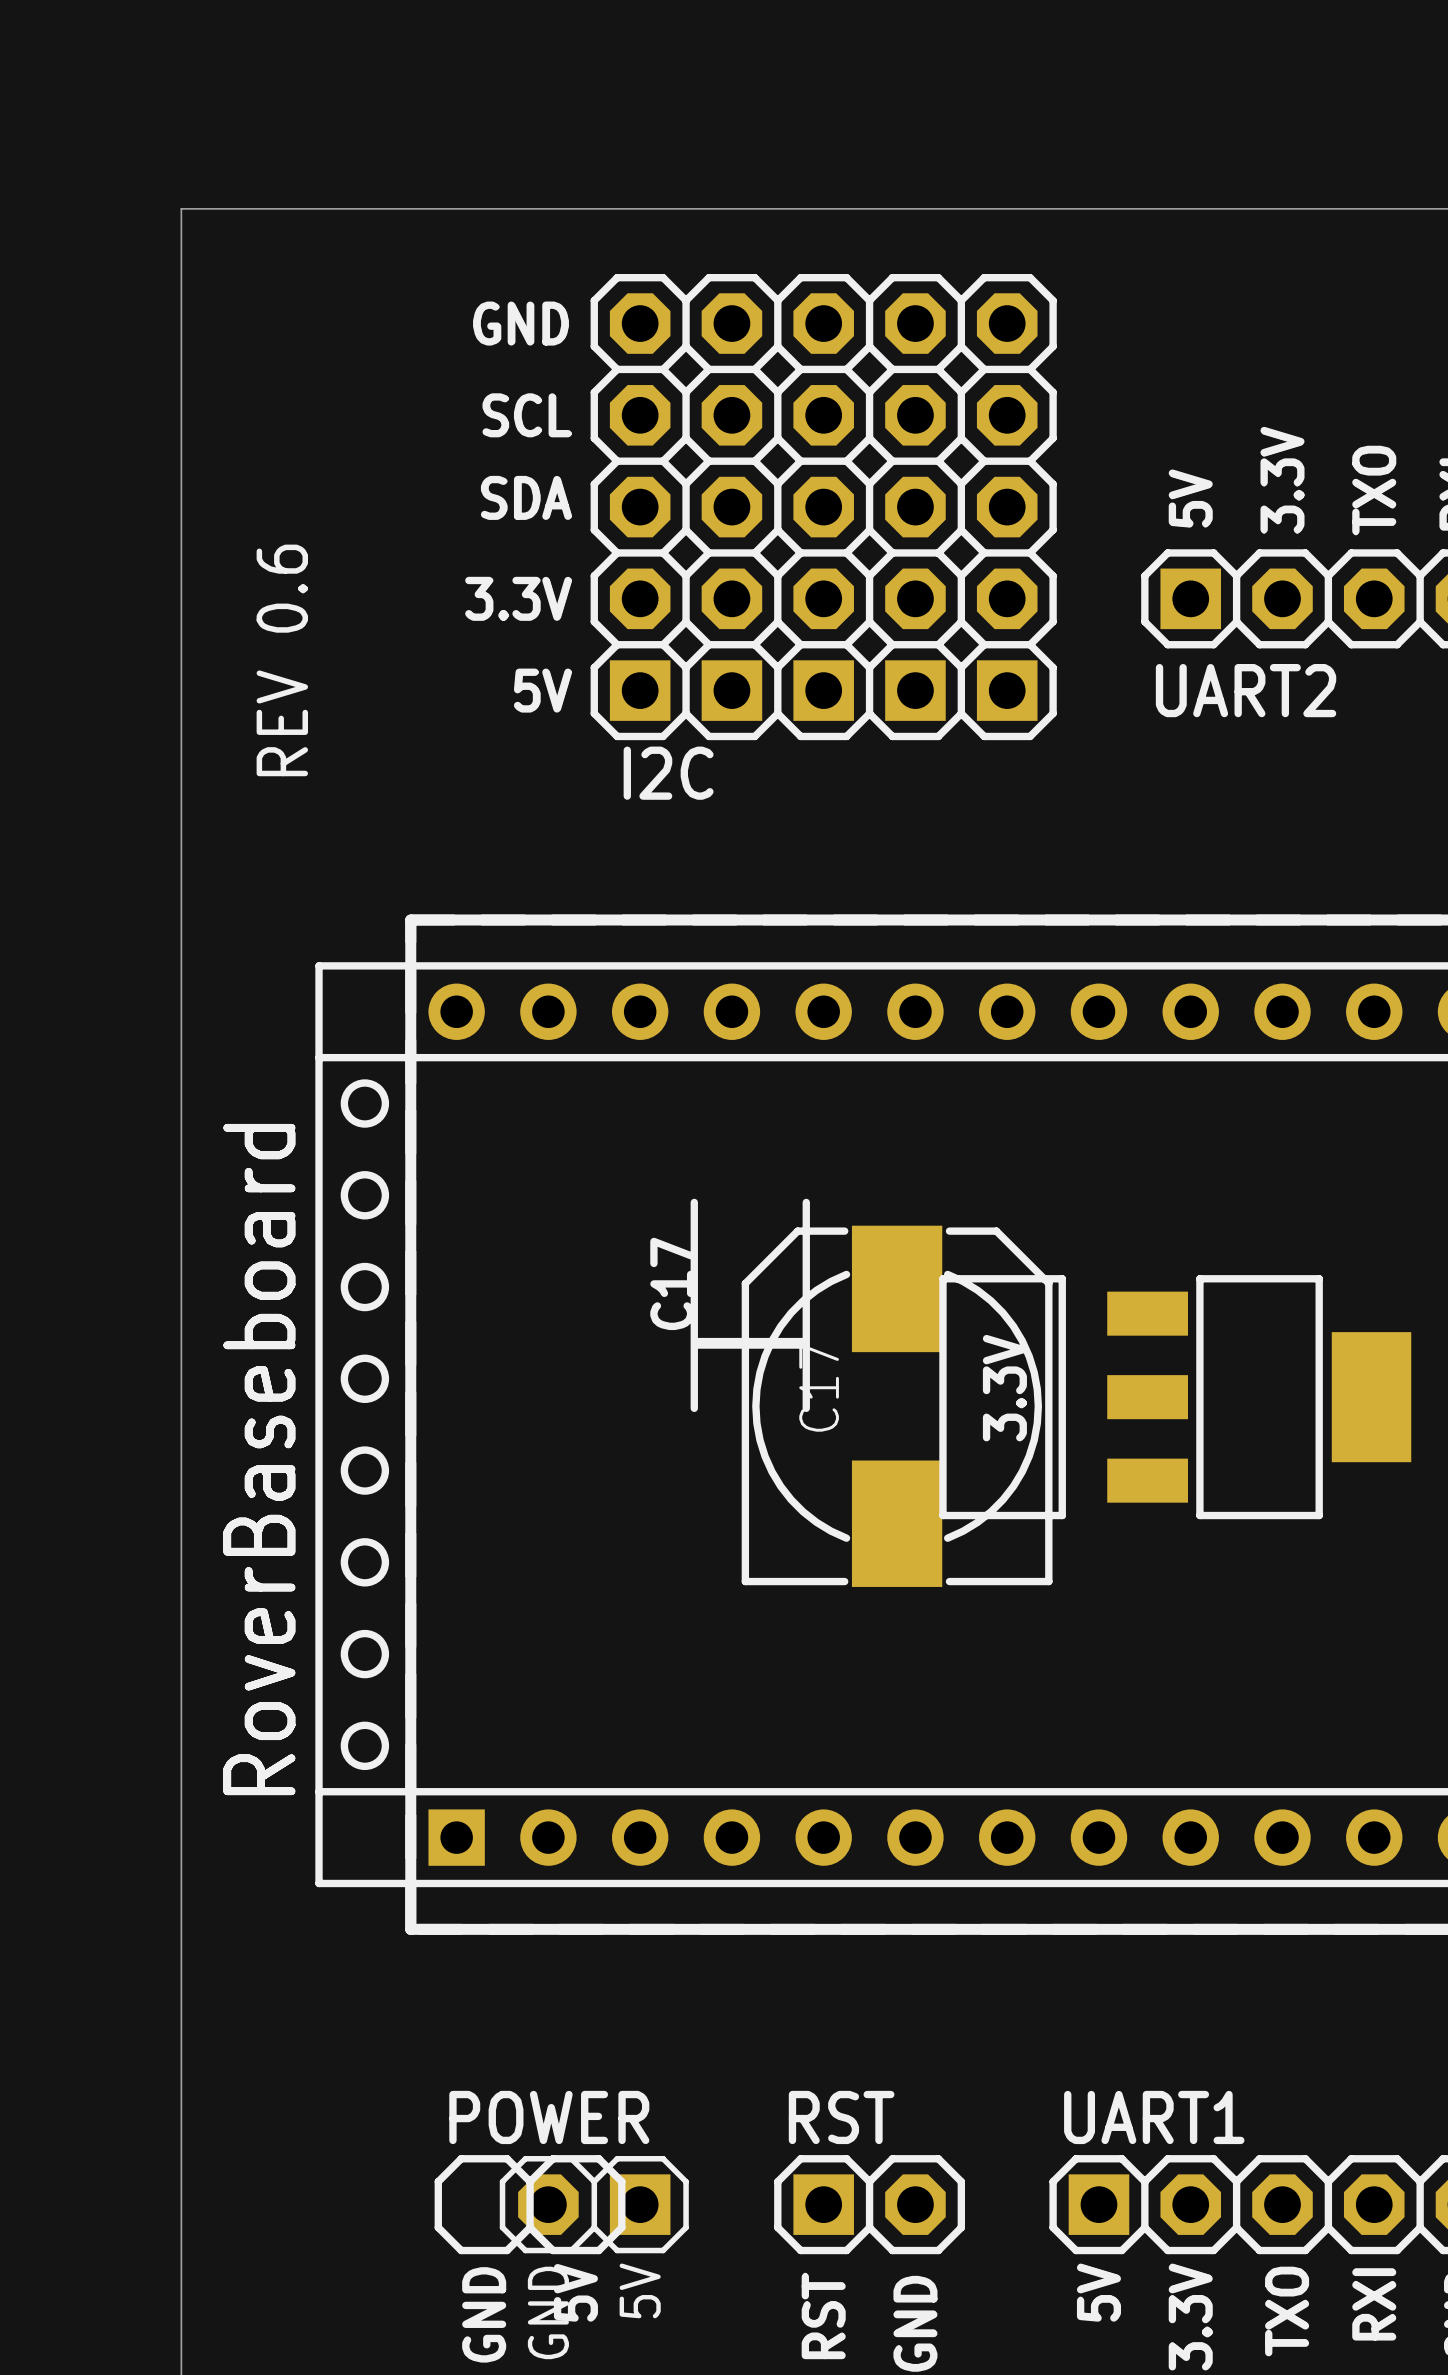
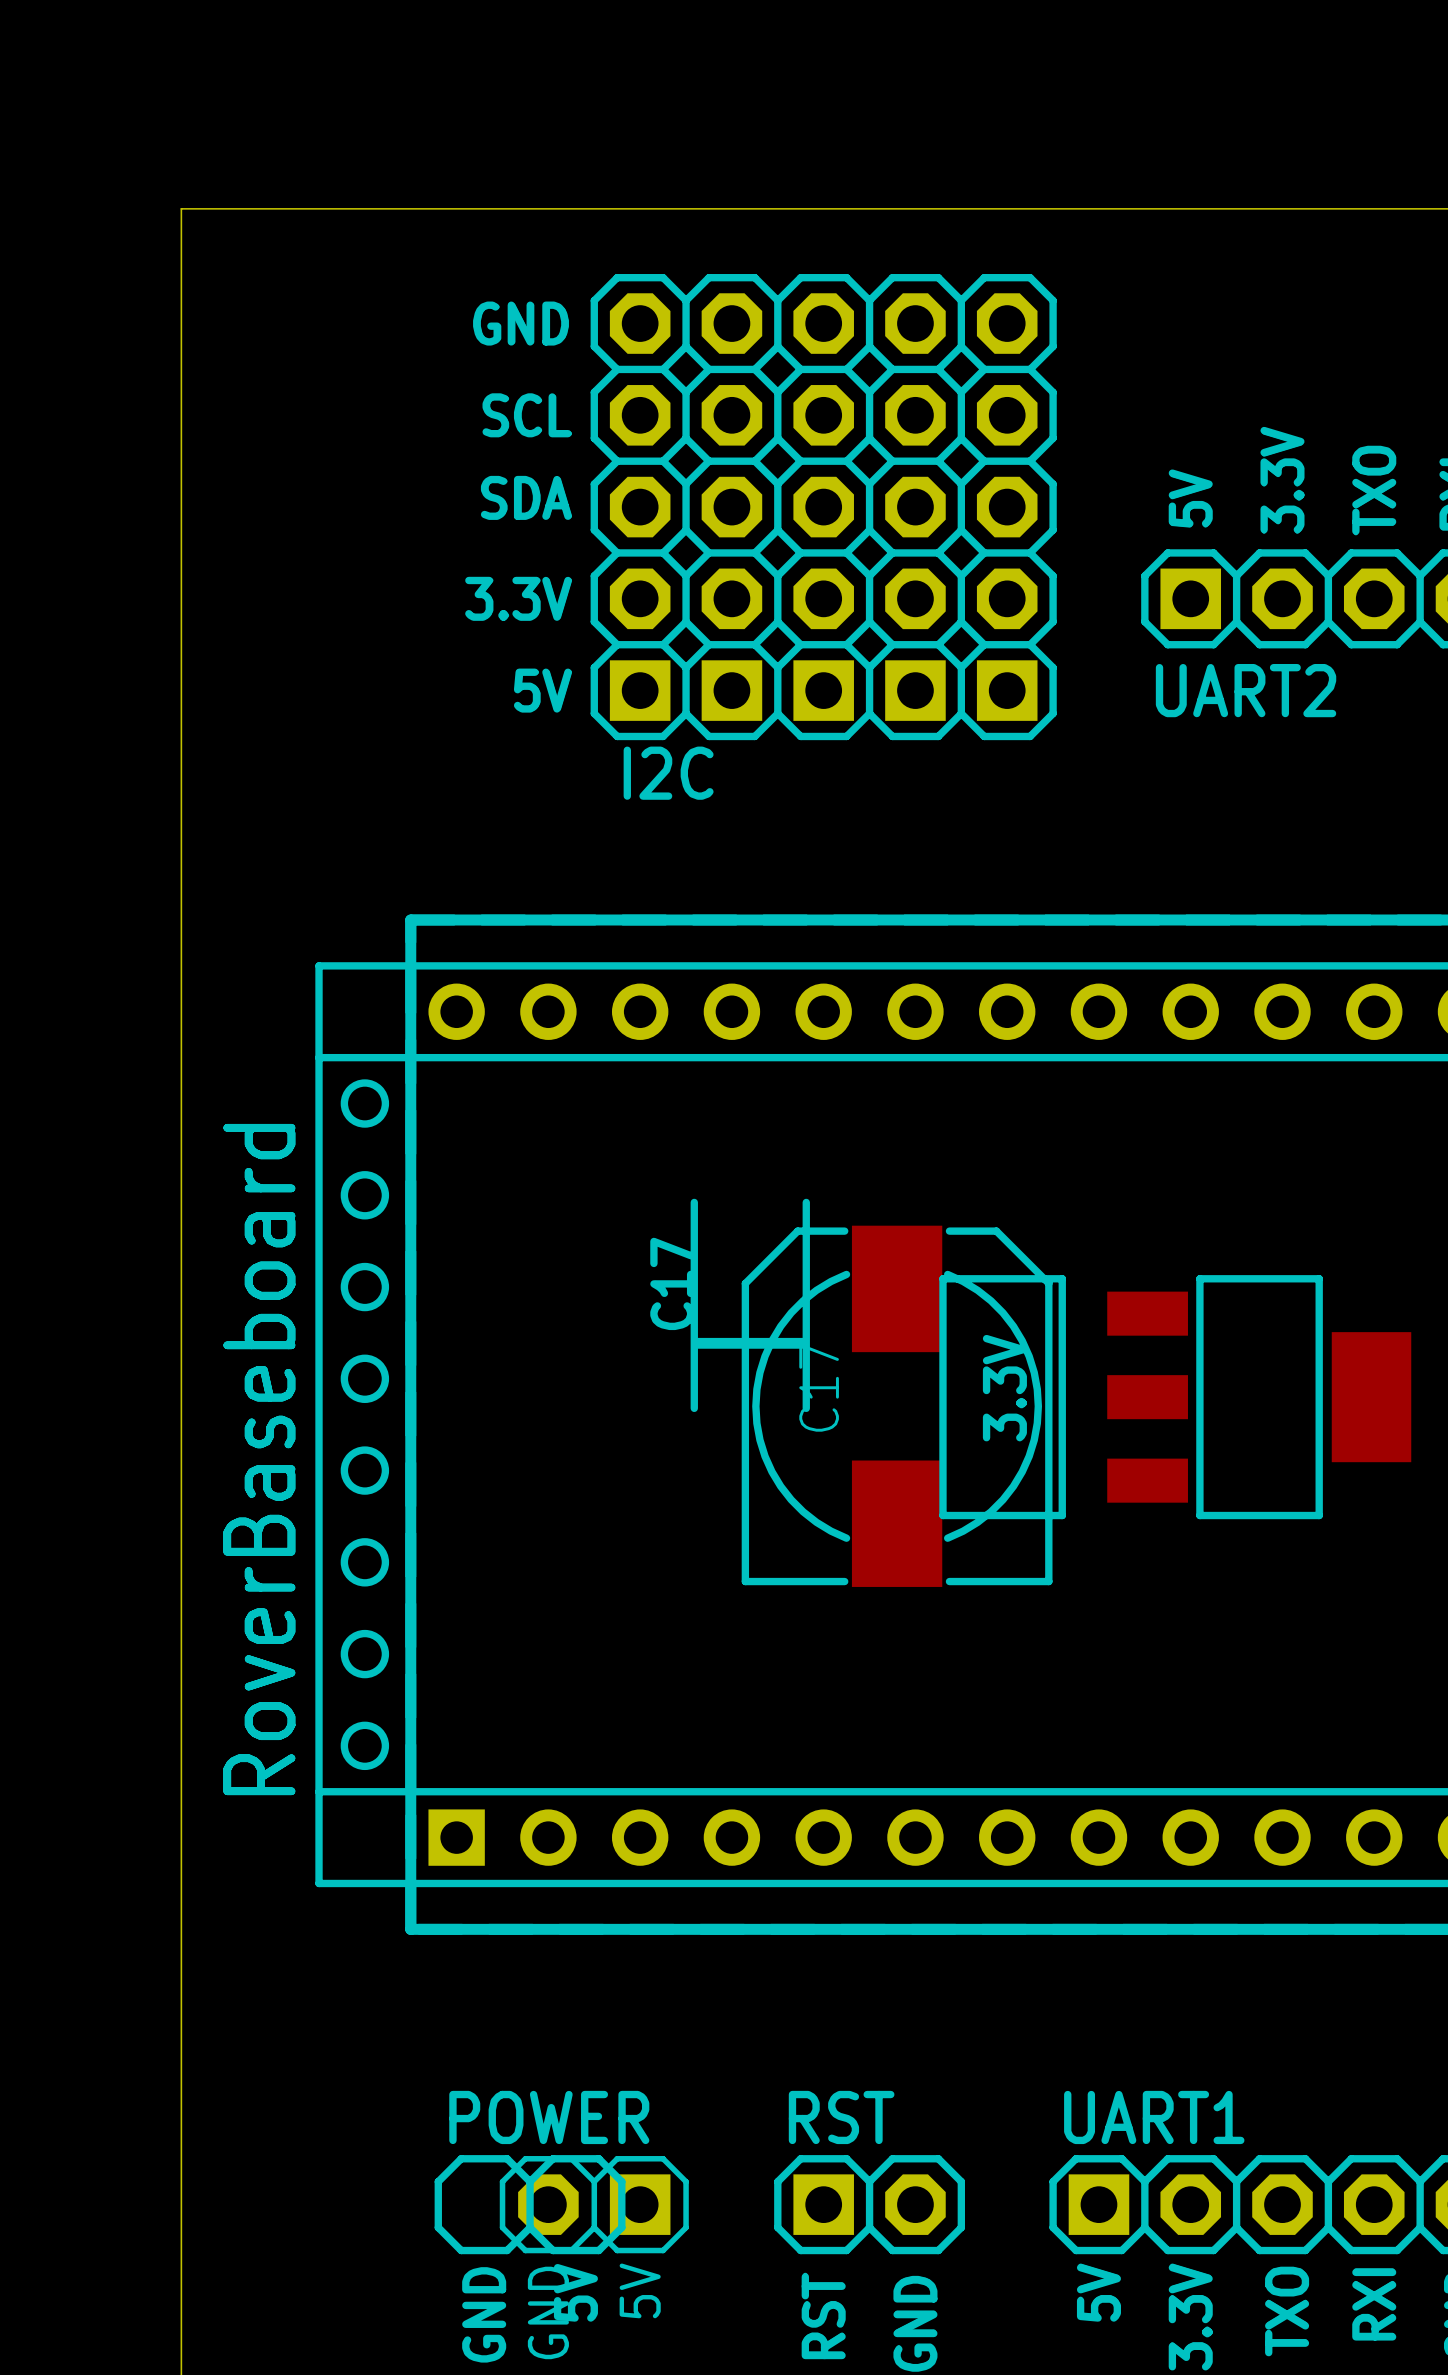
text: REV 0.6 (282, 660) -> none

